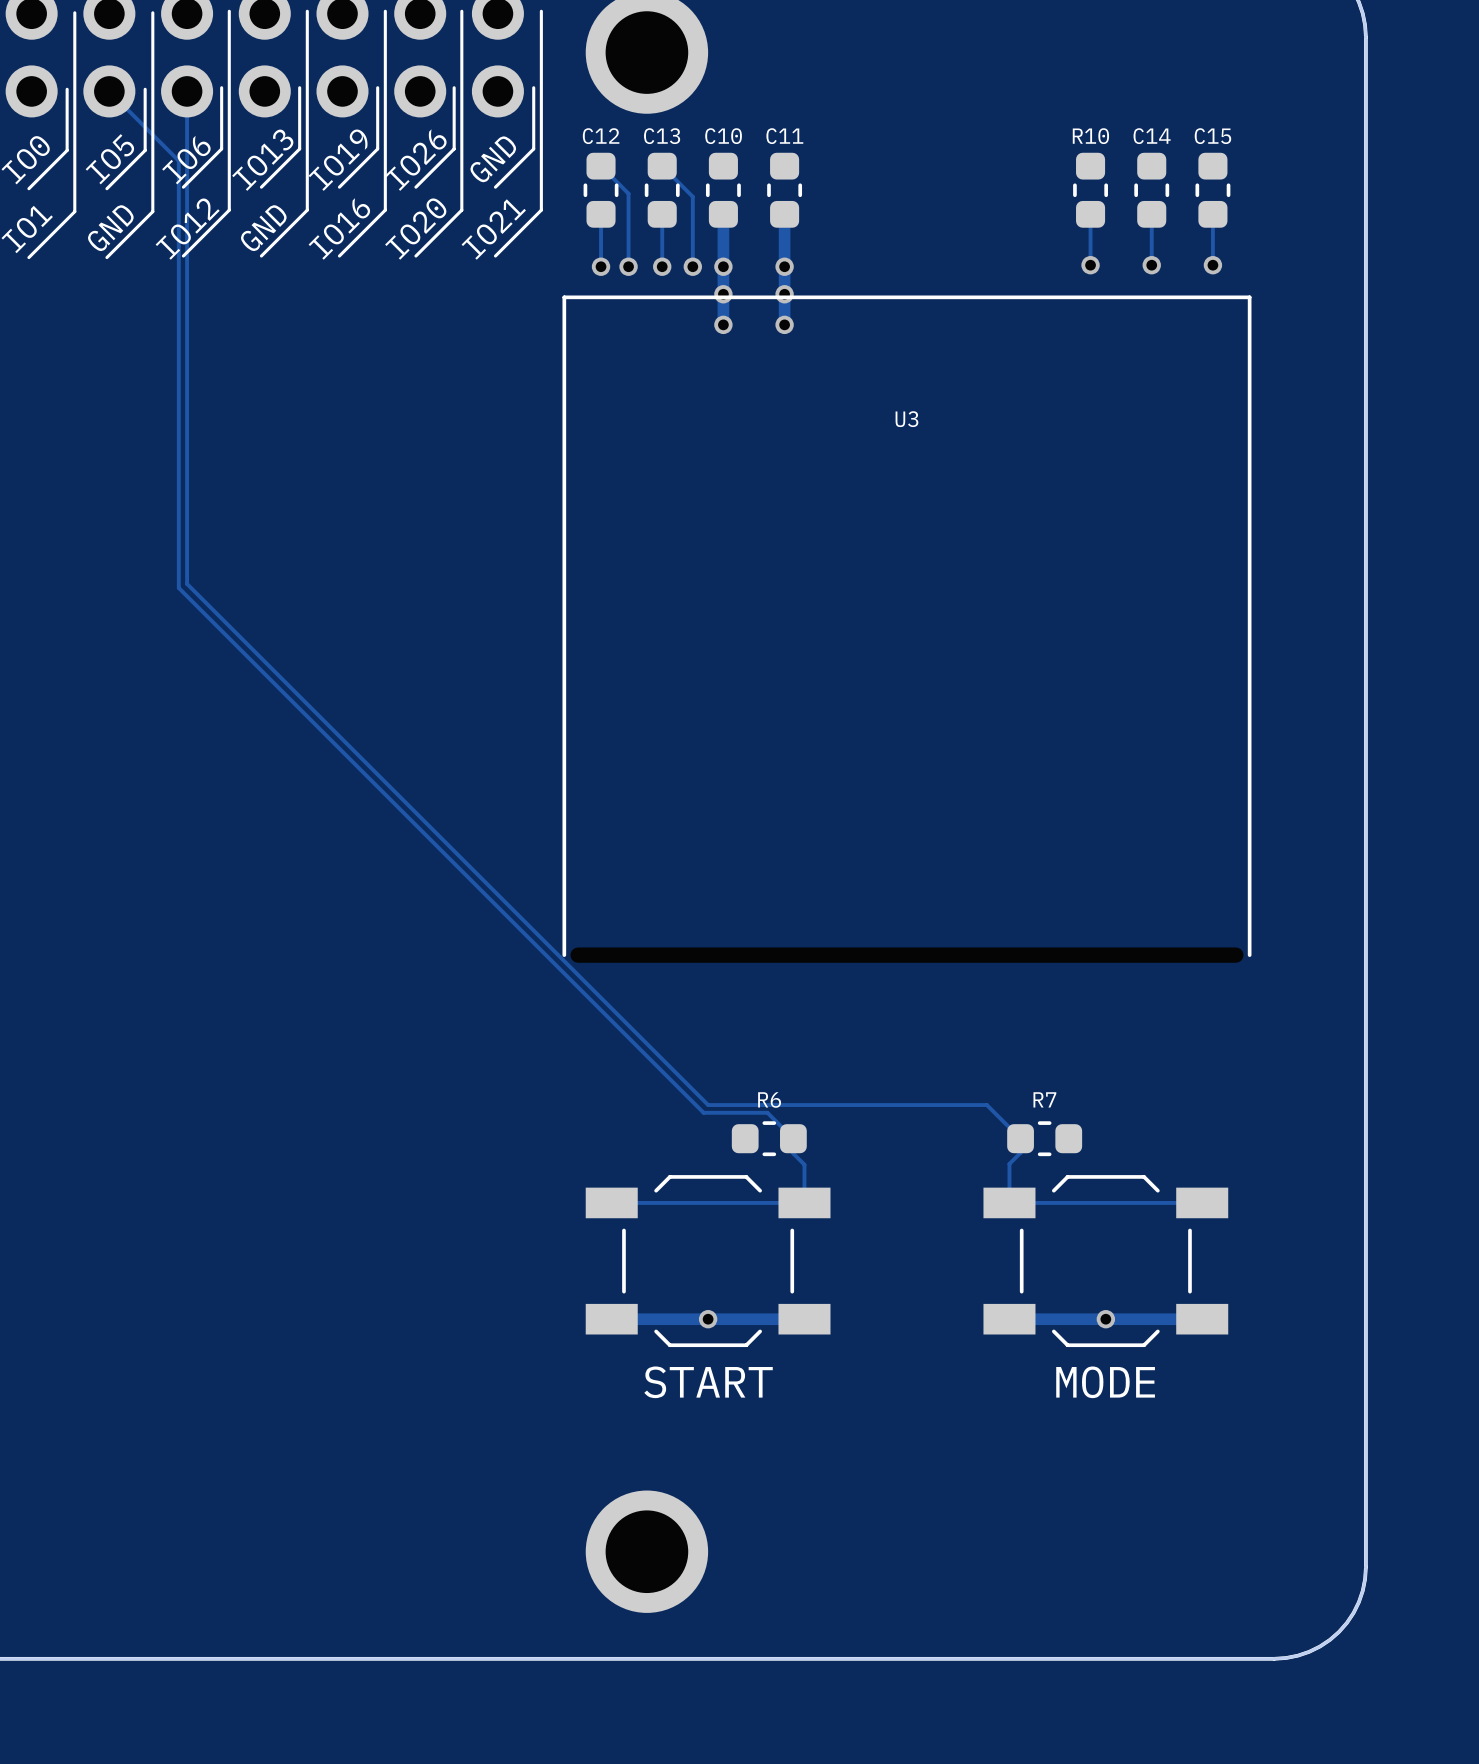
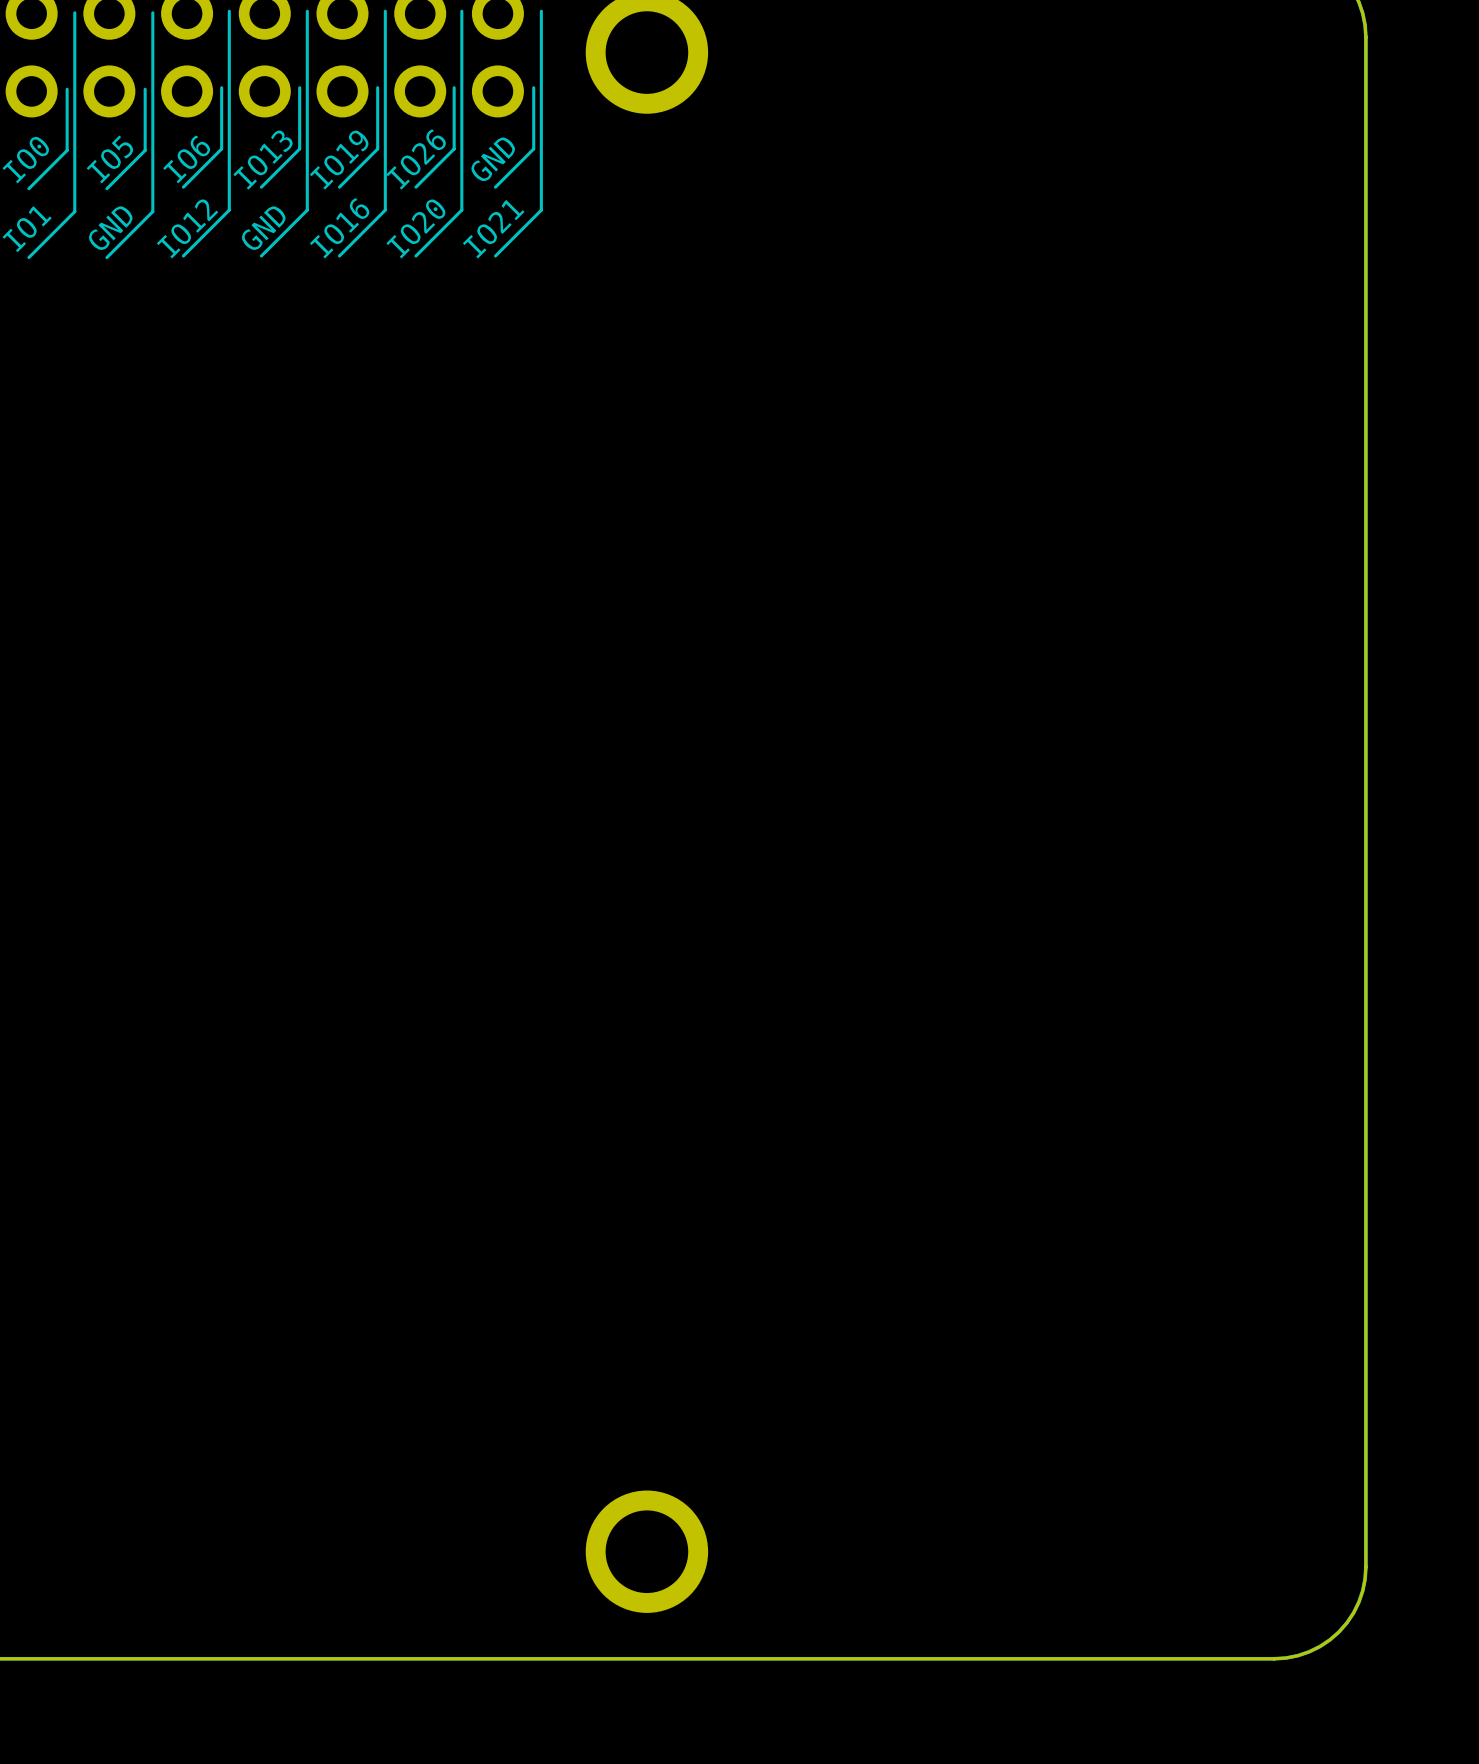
track: (109, 91) (178, 160) (178, 587) (703, 1112) (767, 1112) (793, 1138) (793, 1153) (804, 1164) (804, 1202) (611, 1202) -> none
track: (187, 91) (187, 583) (708, 1105) (986, 1105) (1020, 1138) (1020, 1152) (1009, 1163) (1009, 1202) (1202, 1202) -> none
track: (601, 166) (628, 193) (628, 266) -> none
track: (662, 166) (692, 196) (692, 266) -> none
C12: (601, 190) -> none
C13: (662, 190) -> none
C10: (723, 190) -> none
C11: (784, 190) -> none
R10: (1090, 190) -> none
C14: (1151, 190) -> none
C15: (1212, 190) -> none
track: (601, 214) (601, 266) -> none
track: (662, 214) (662, 266) -> none
track: (723, 214) (723, 324) -> none
track: (784, 214) (784, 324) -> none
track: (1090, 214) (1090, 265) -> none
track: (1151, 214) (1151, 265) -> none
track: (1212, 214) (1212, 265) -> none
via: (1090, 265) -> none
via: (1151, 265) -> none
via: (1212, 265) -> none
via: (601, 266) -> none
via: (628, 266) -> none
via: (662, 266) -> none
via: (692, 266) -> none
via: (723, 266) -> none
via: (784, 266) -> none
via: (723, 294) -> none
via: (784, 294) -> none
via: (723, 324) -> none
via: (784, 324) -> none
U3: (906, 629) -> none
R6: (769, 1138) -> none
R7: (1044, 1138) -> none
part: START (708, 1261) -> none
part: MODE (1105, 1261) -> none
track: (611, 1319) (804, 1319) -> none
via: (708, 1319) -> none
track: (1009, 1319) (1202, 1319) -> none
via: (1105, 1319) -> none

